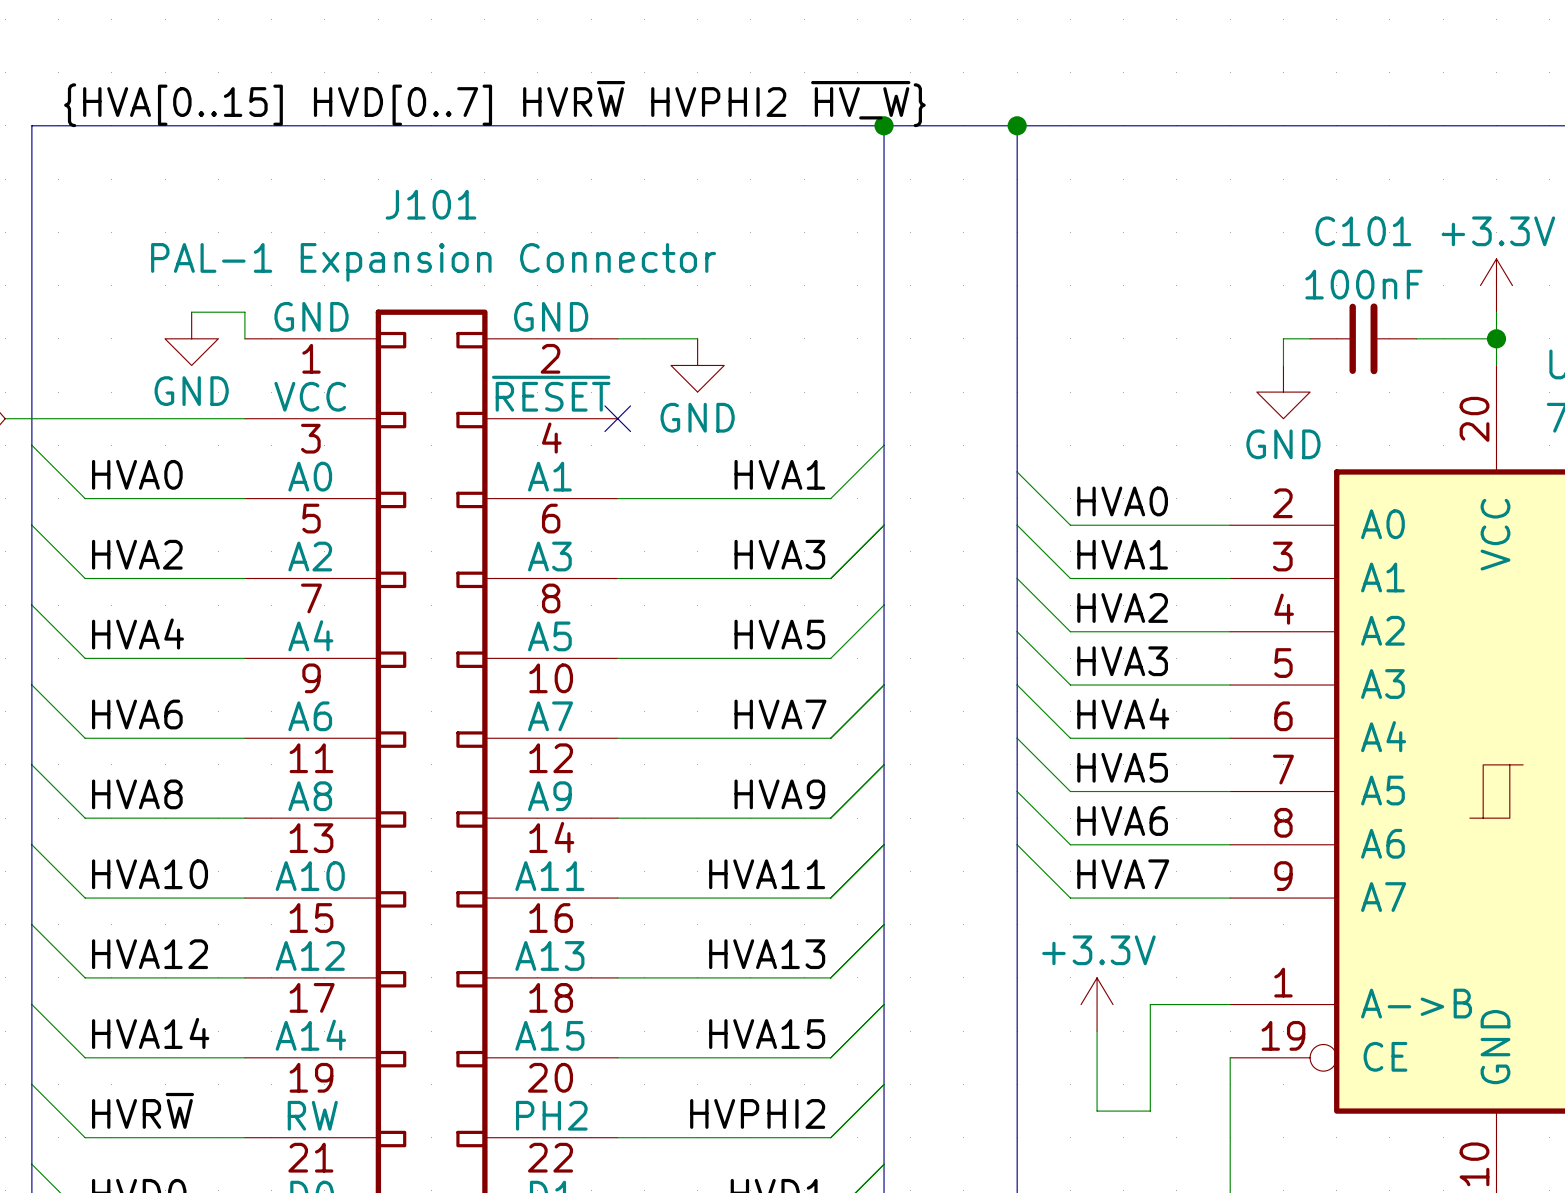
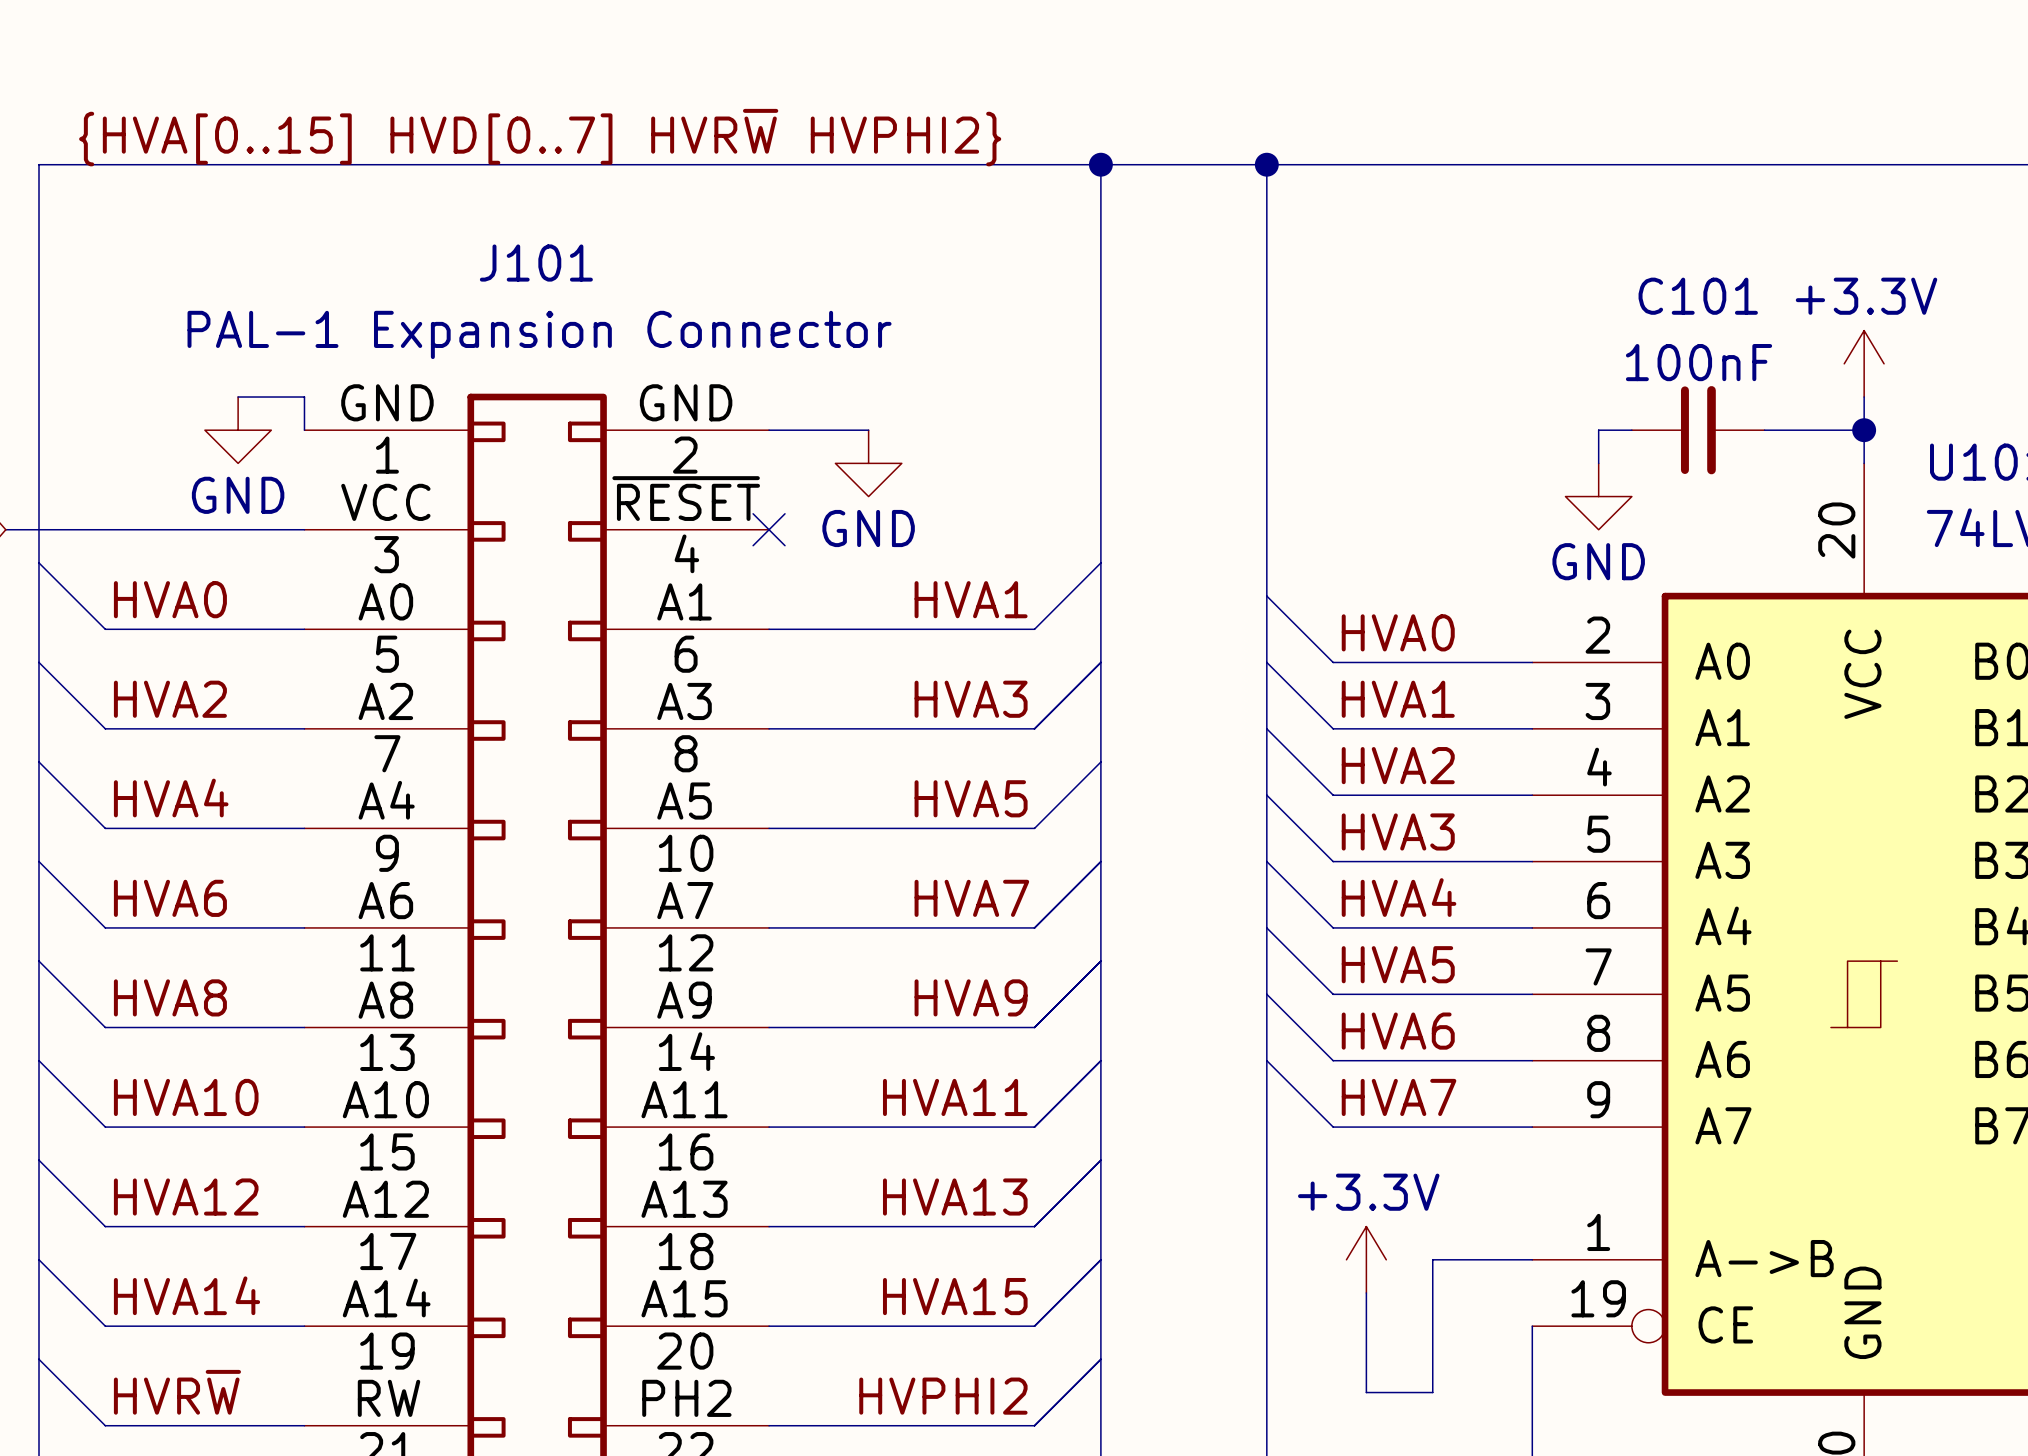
label: {HVA[0..15] HVD[0..7] HVR~{W} HVPHI2 ~{HV_W}} (494, 104) -> {HVA[0..15] HVD[0..7] HVR~{W} HVPHI2} (540, 137)

